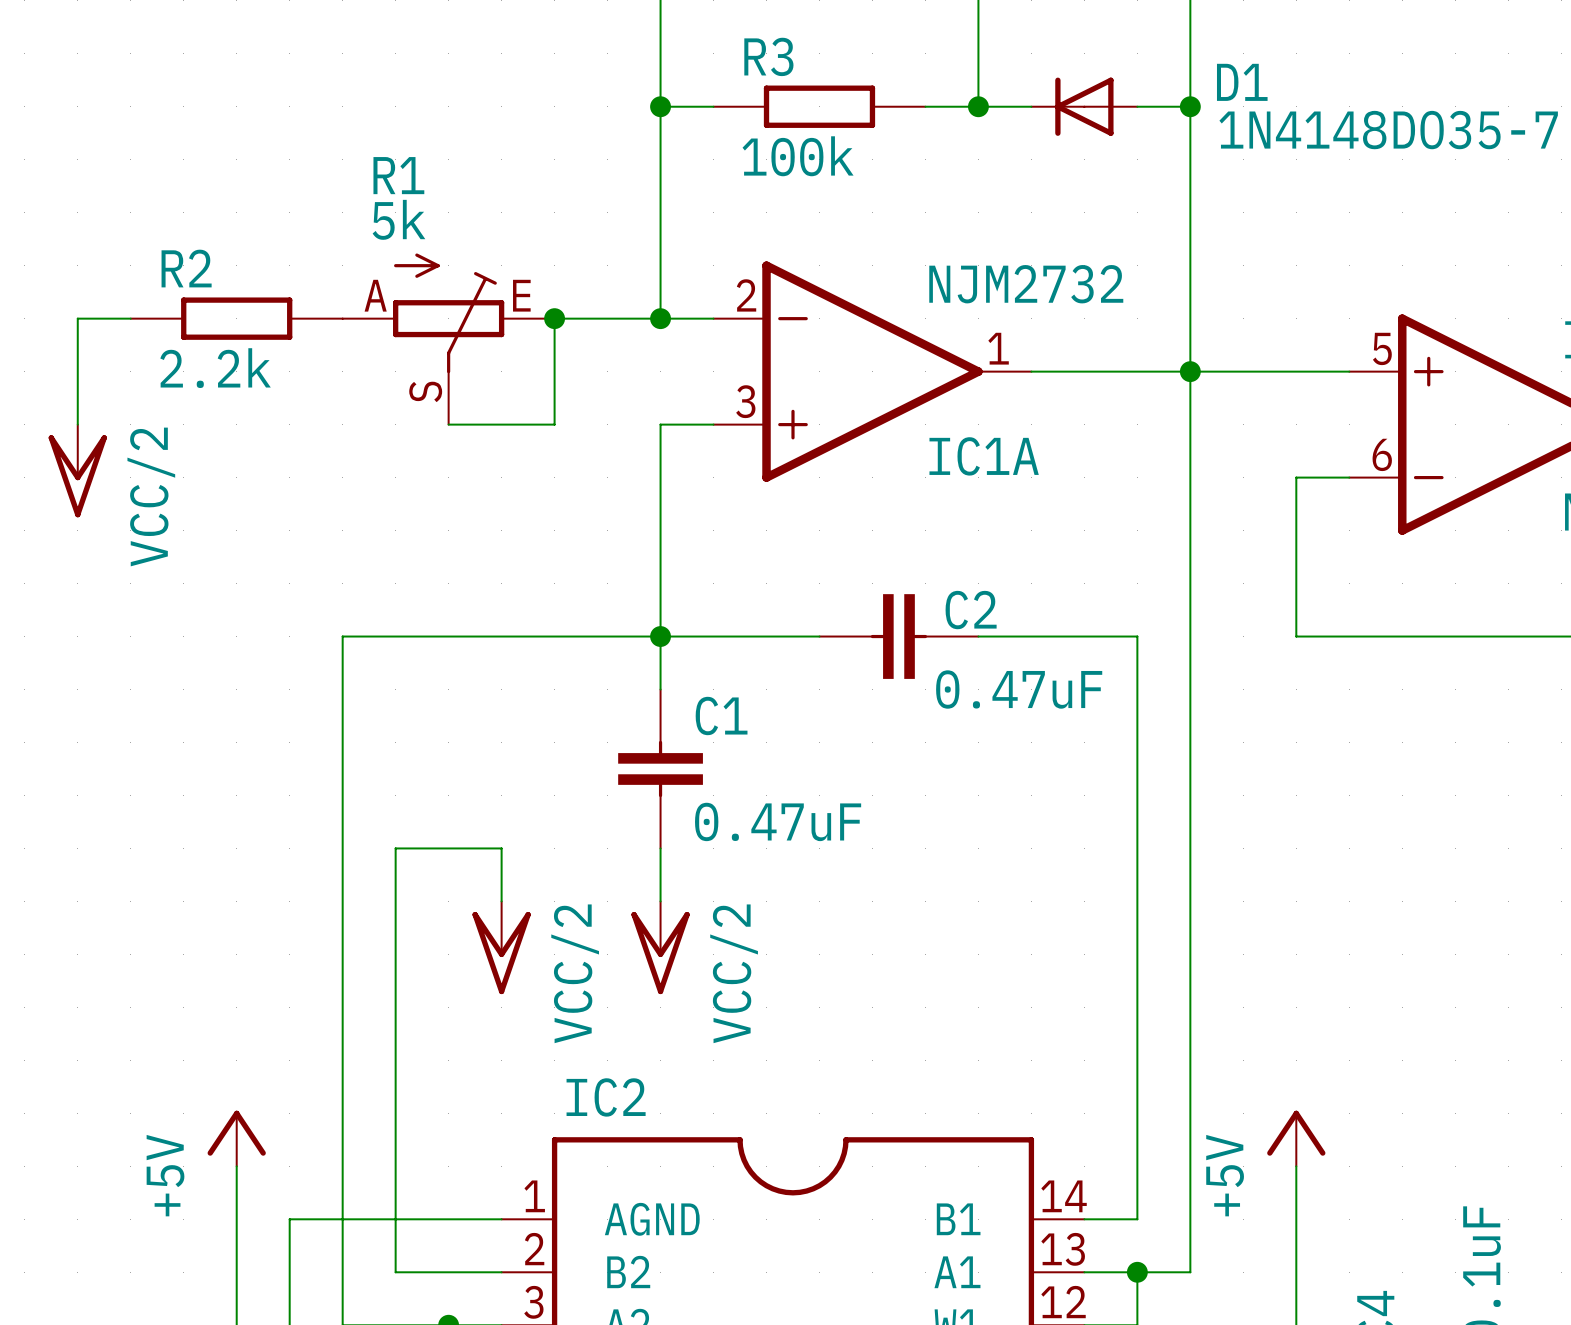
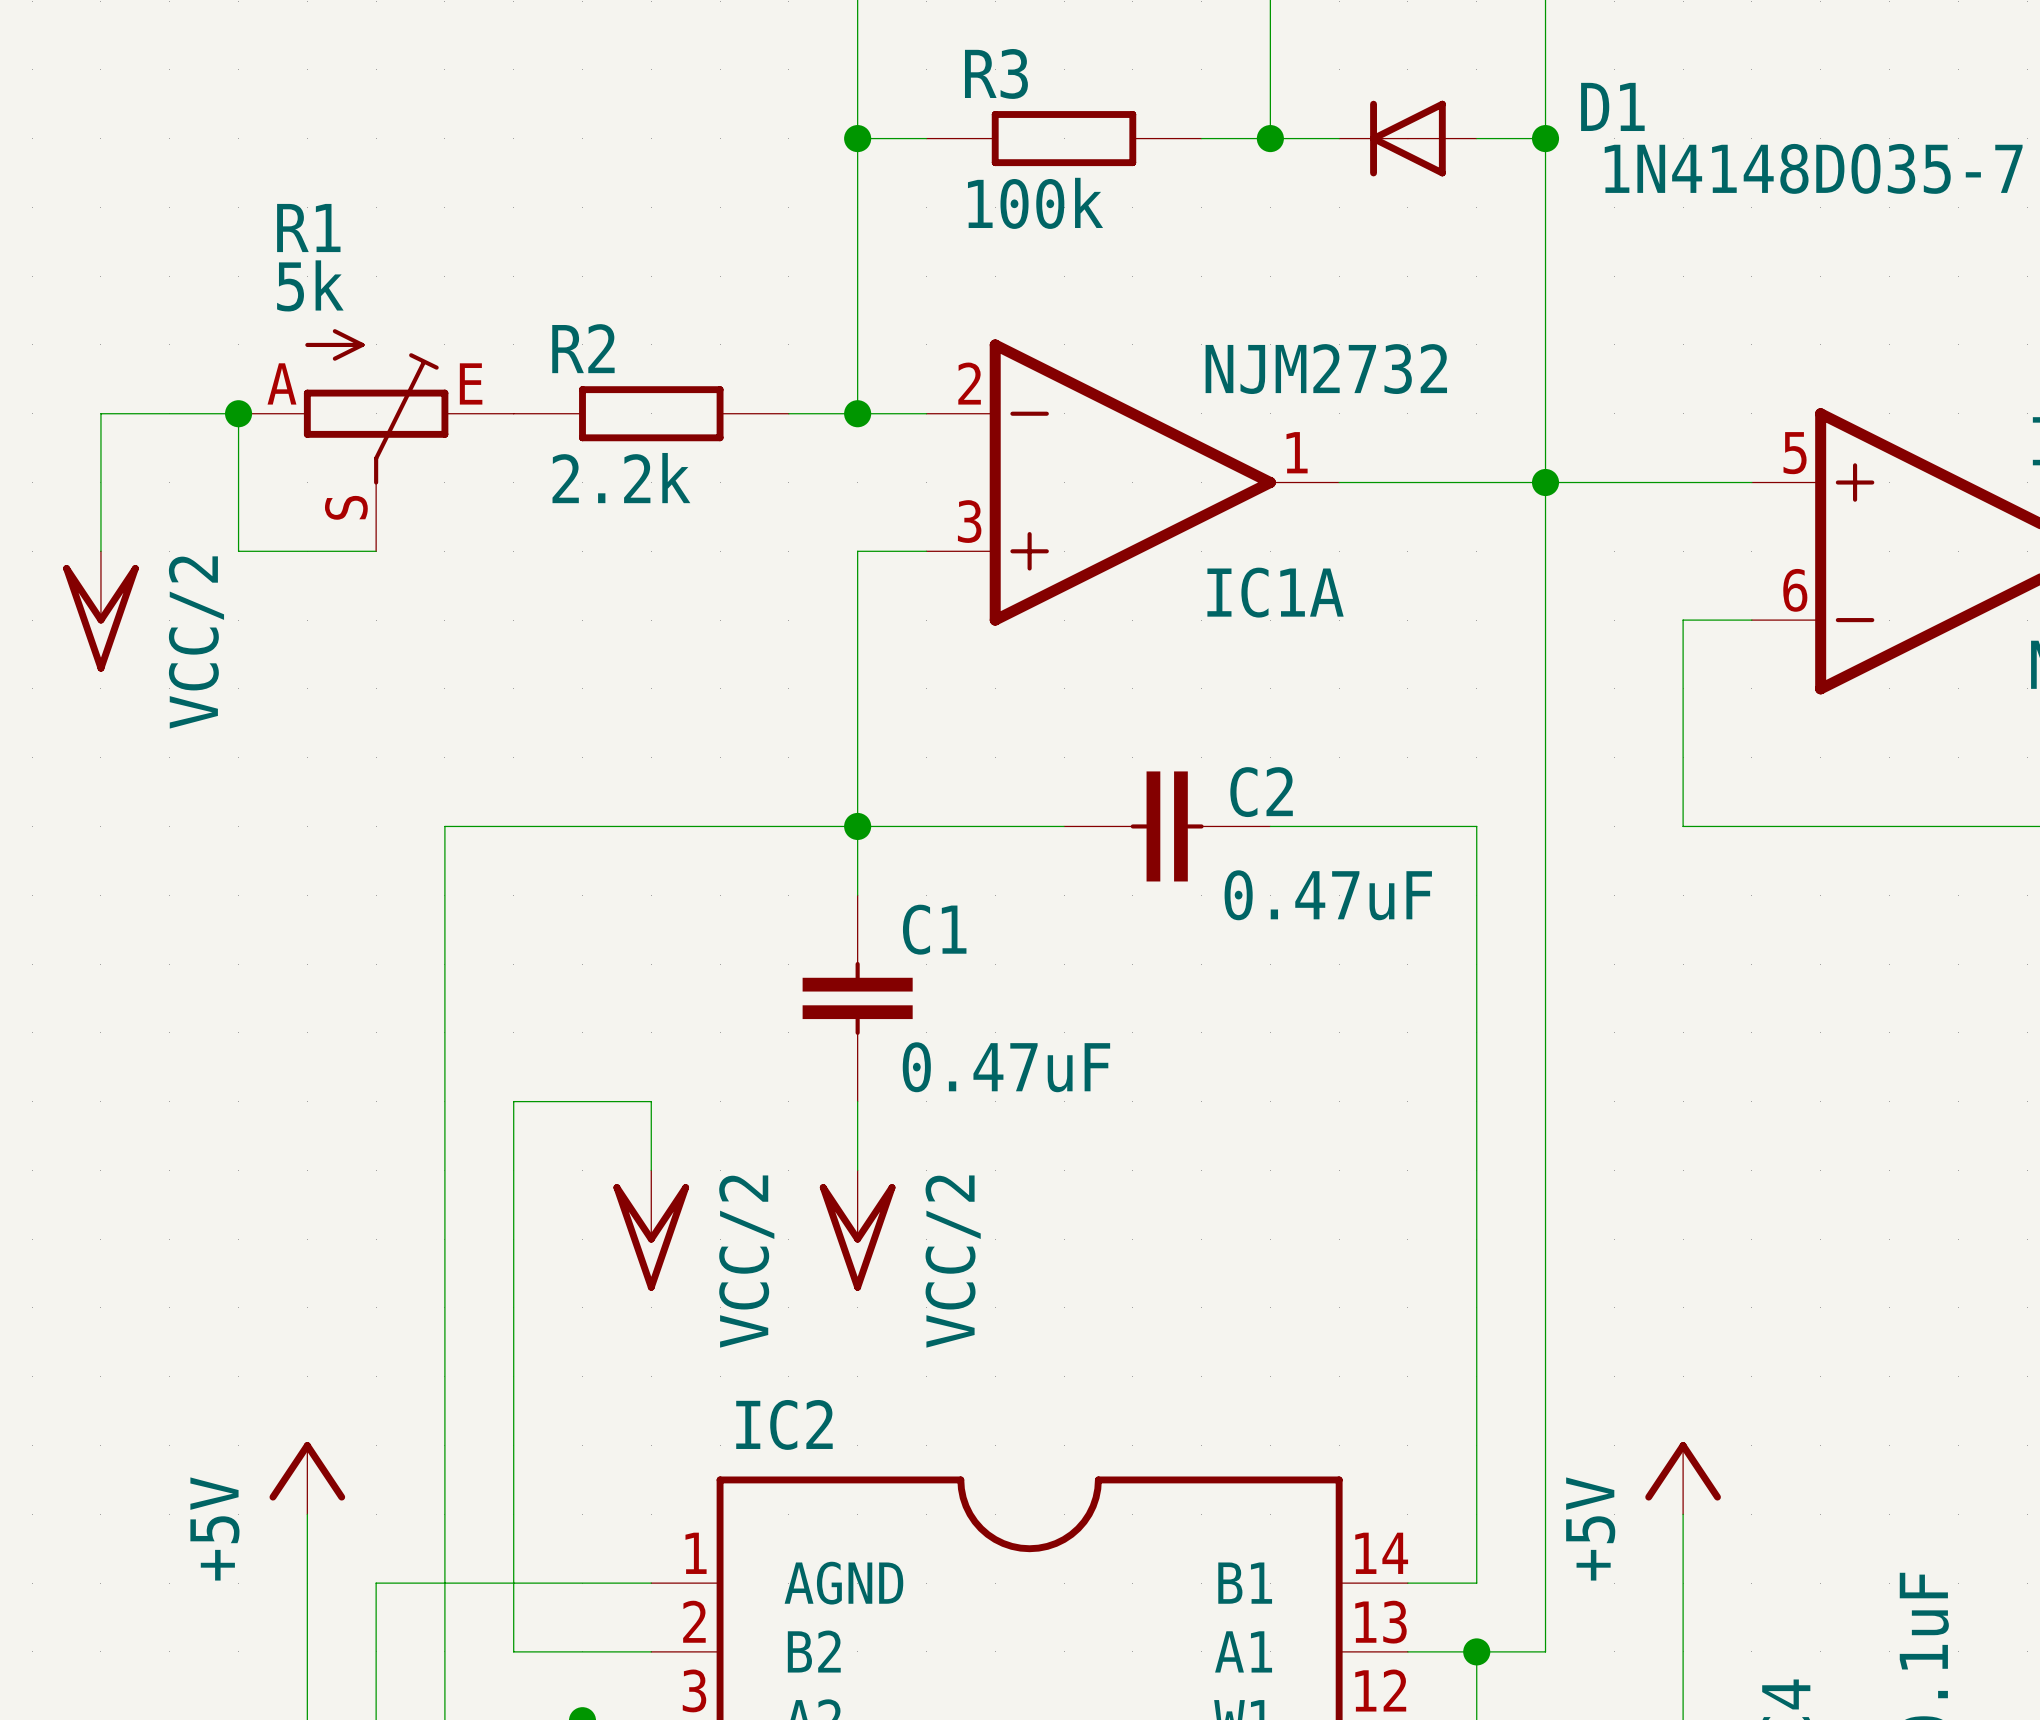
wire: none -> (169, 413) (238, 413) (238, 551) (376, 551)
junction: none -> (238, 413)
R2 position: (236, 318) -> (651, 413)
junction: (554, 318) -> none
wire: (607, 318) (554, 318) (554, 424) (448, 424) -> none
R1 position: (448, 339) -> (376, 440)

